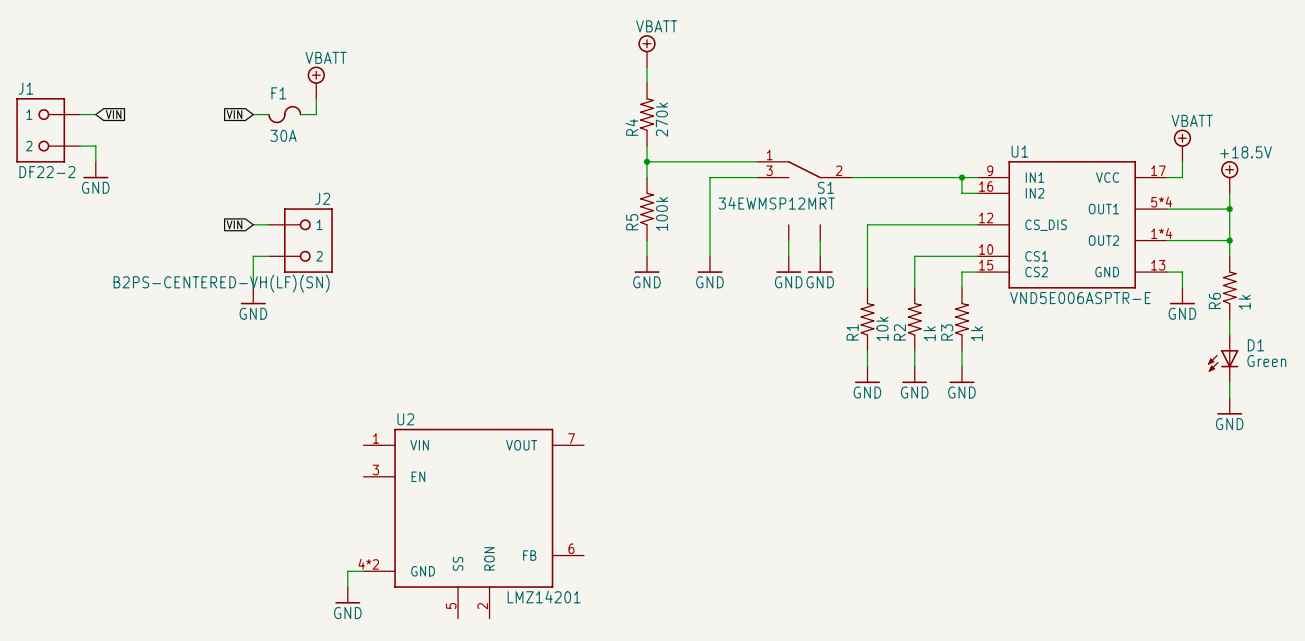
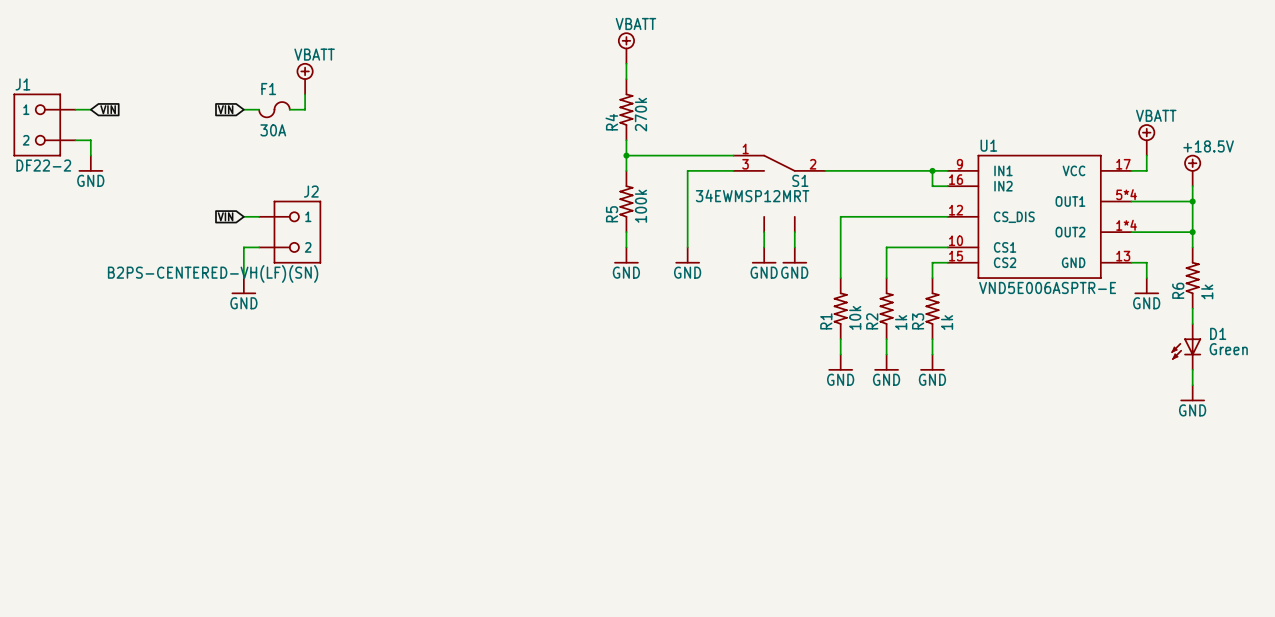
U2: LMZ14201 (473, 523) -> none
wire: (363, 571) (347, 571) (347, 587) -> none
power symbol: GND (347, 595) -> none

